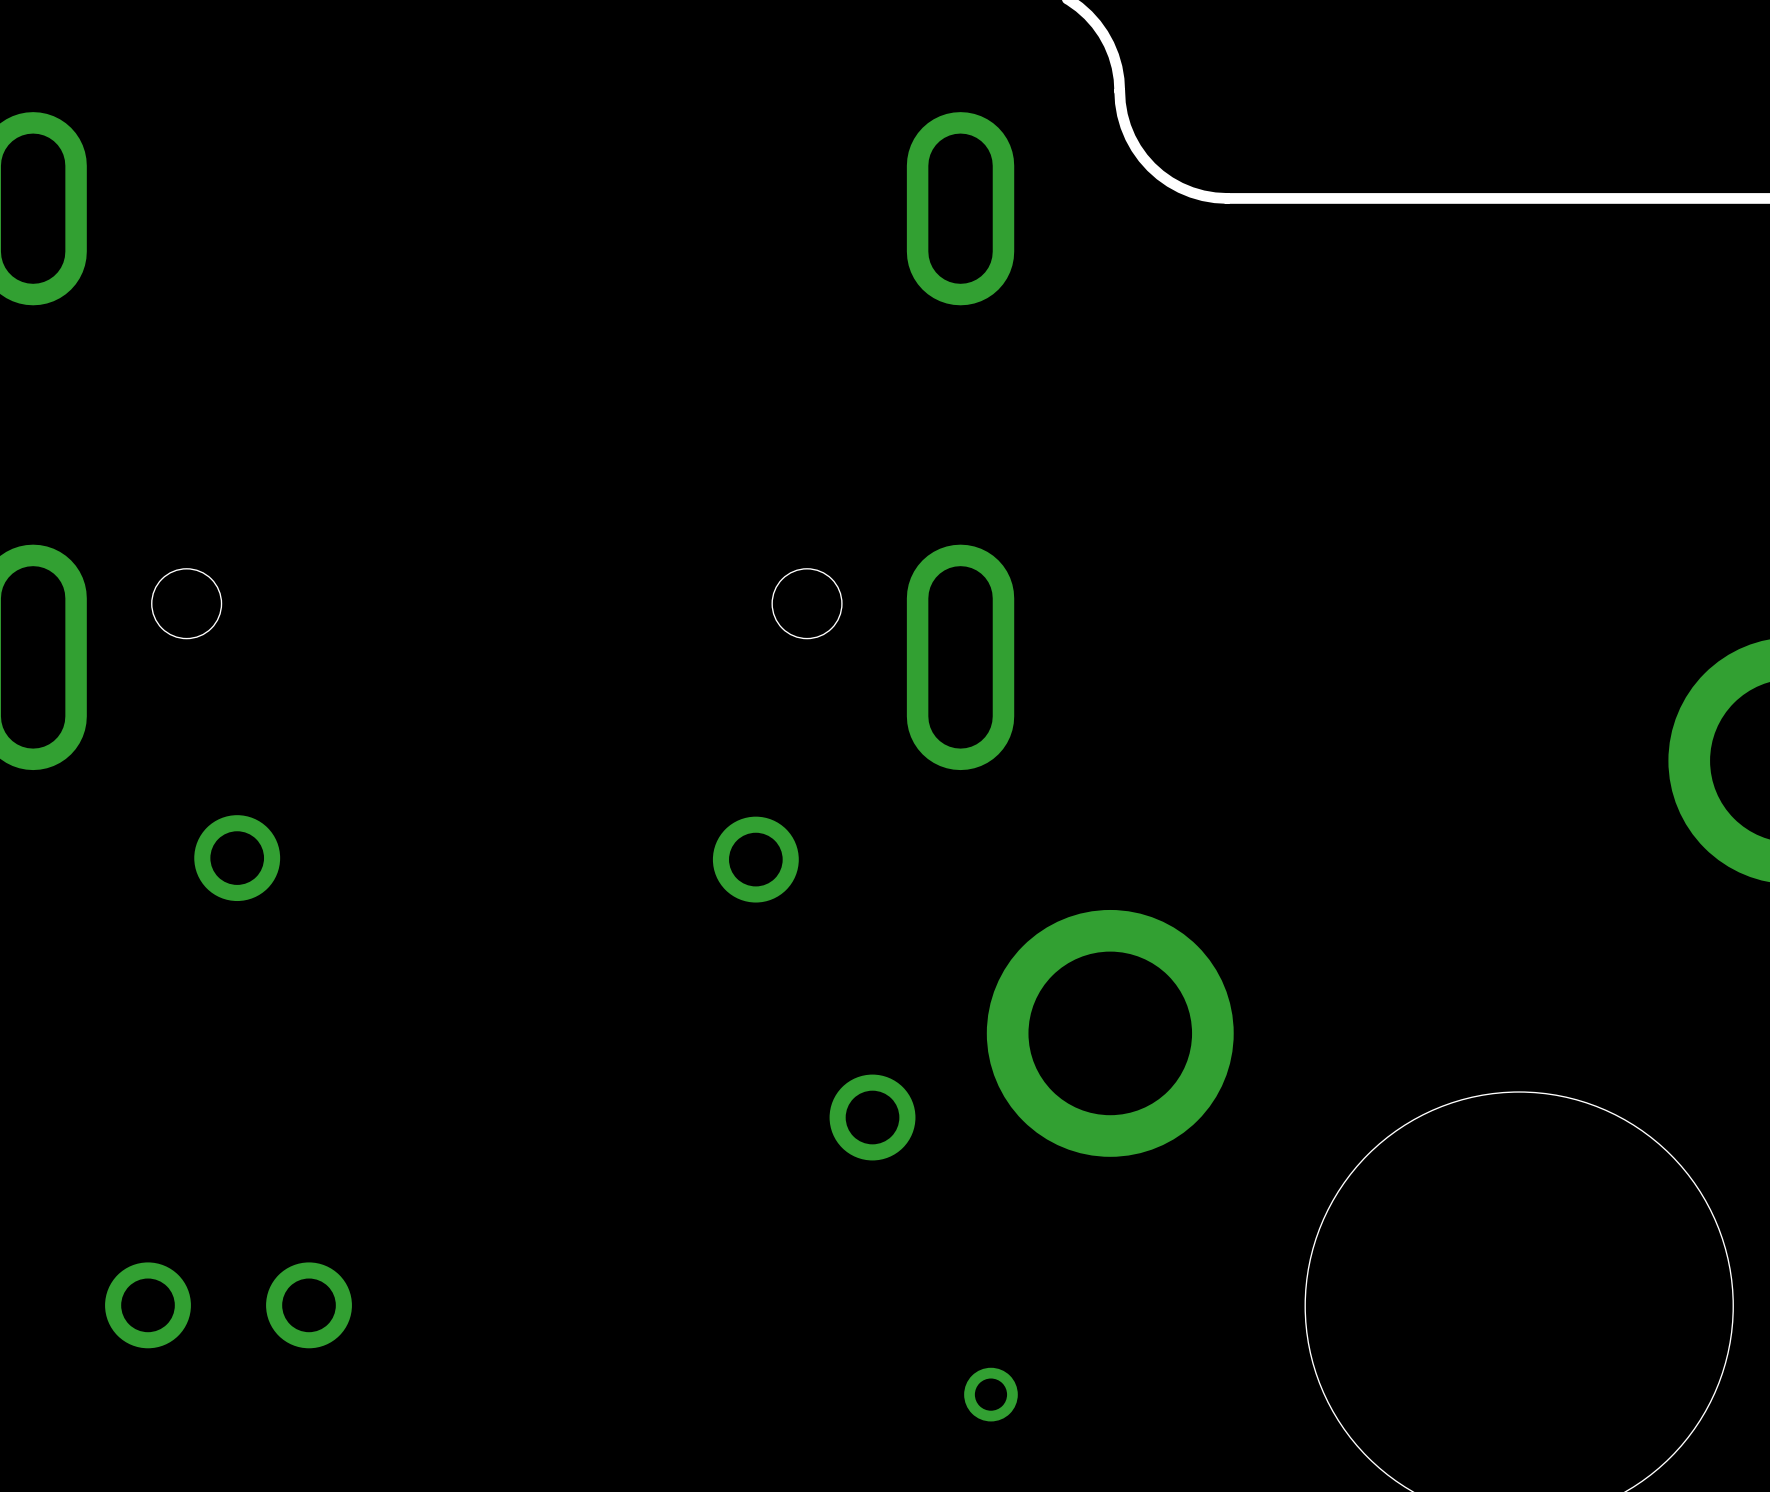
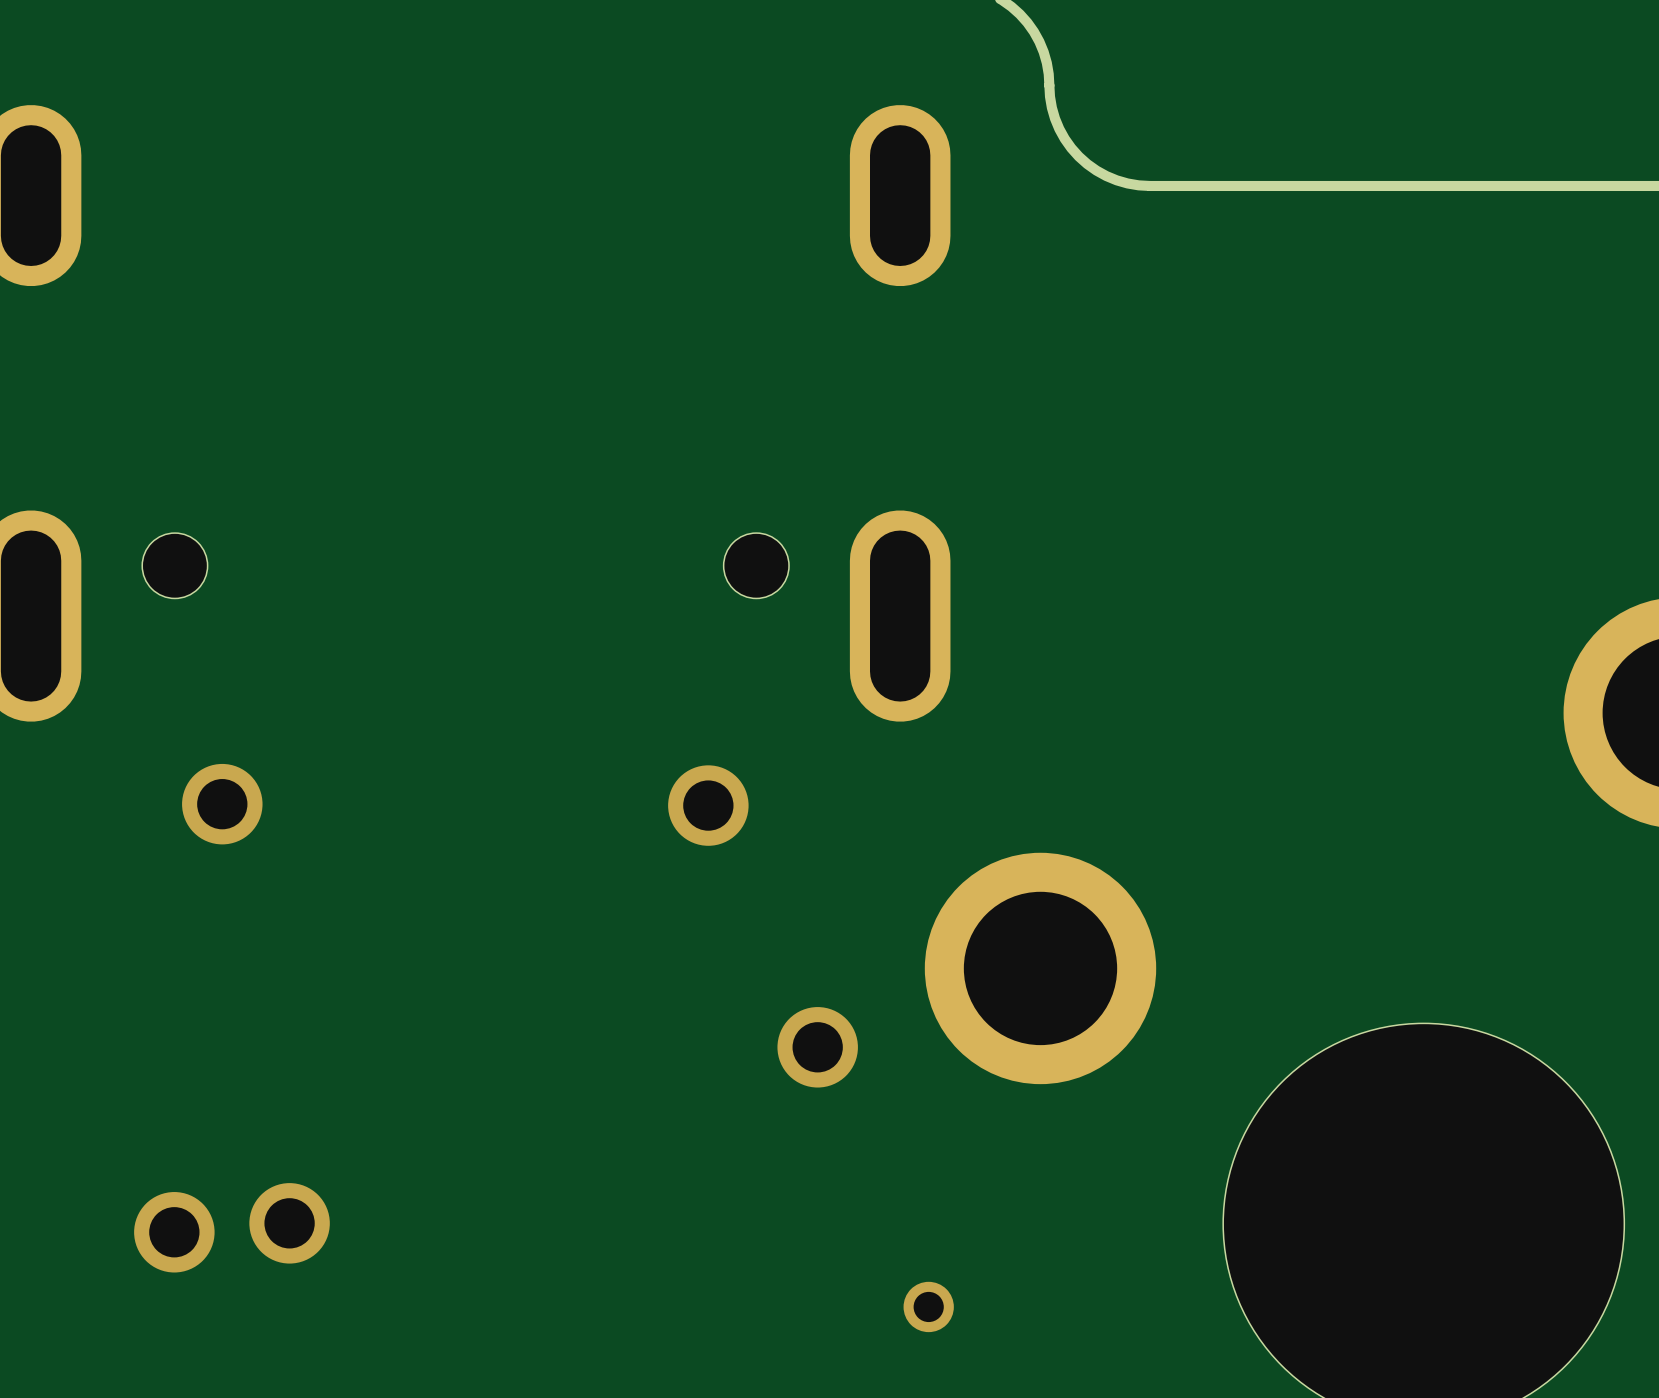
via position: (148, 1305) -> (174, 1232)

